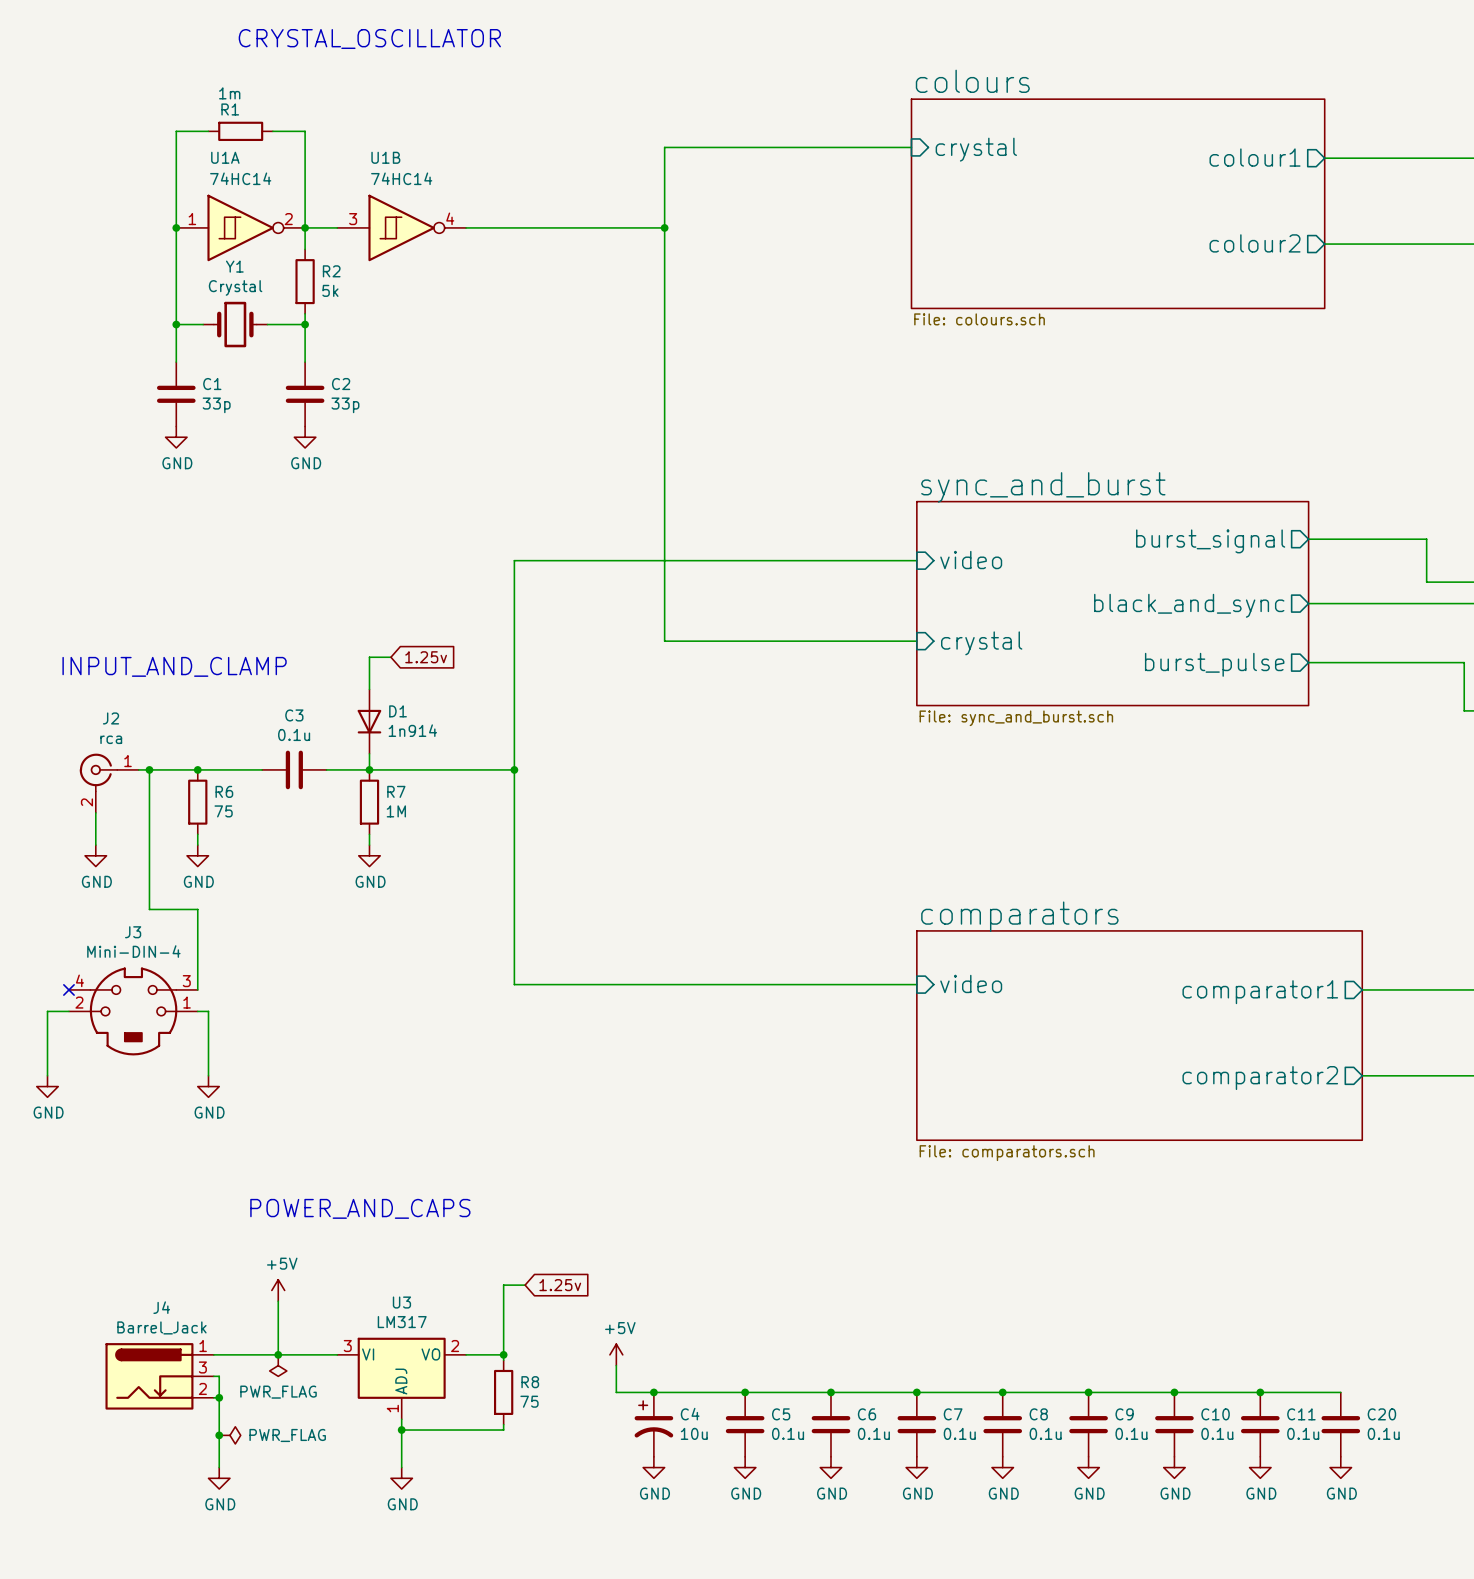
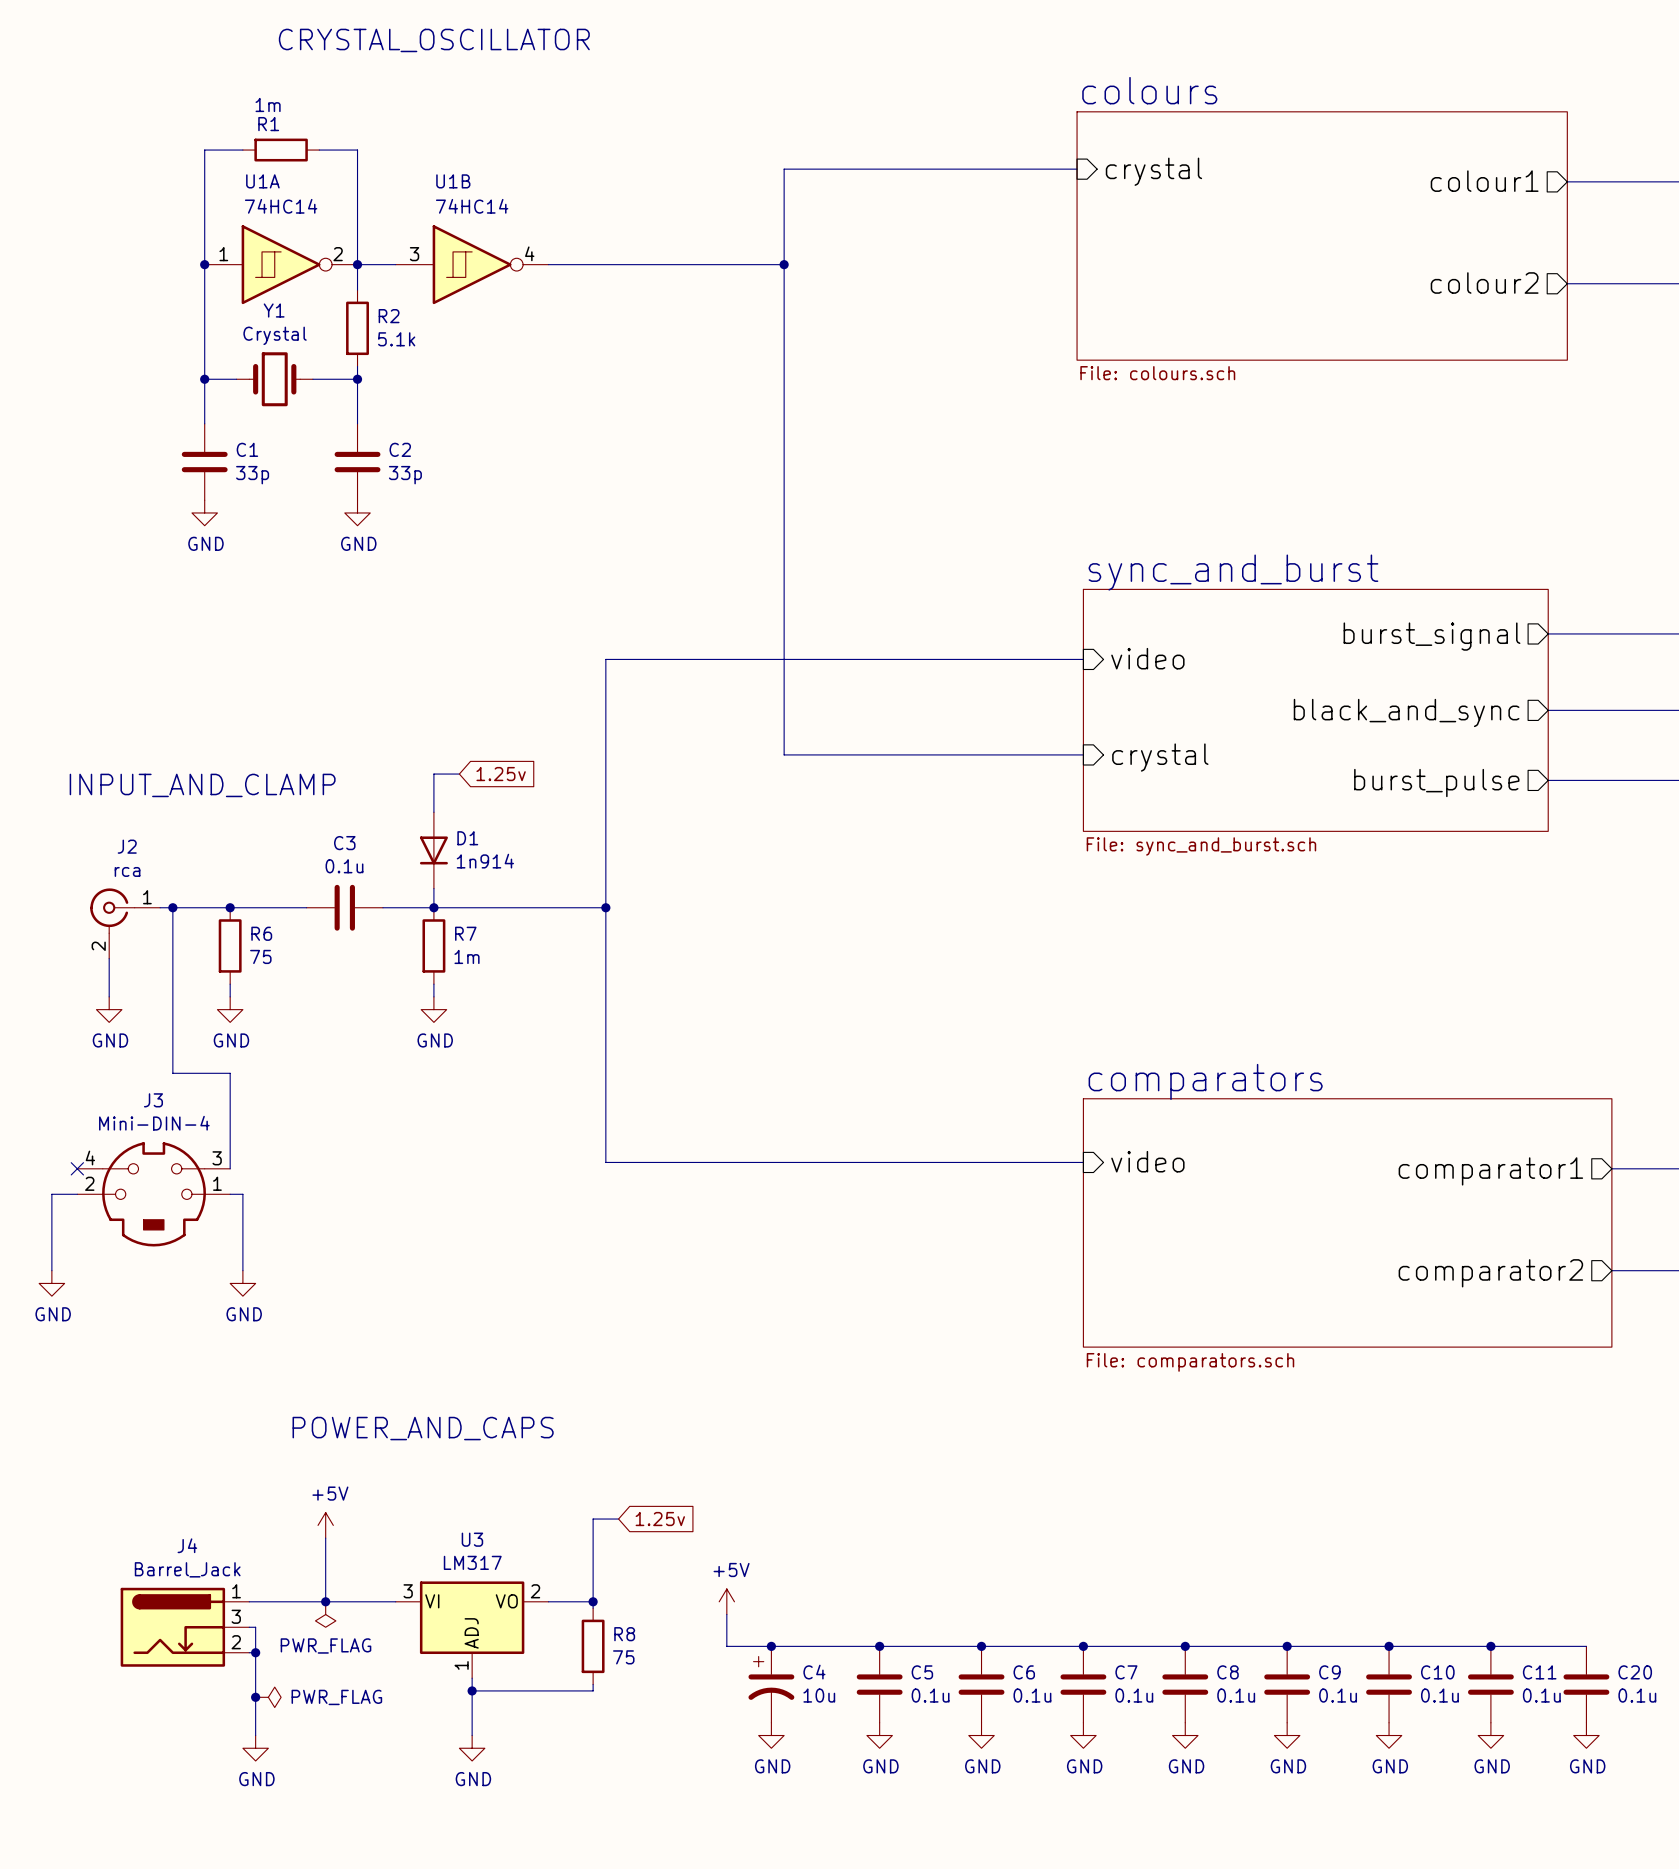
R2 value: 5k (330, 290) -> 5.1k (396, 339)
R7 value: 1M (396, 811) -> 1m (467, 956)

